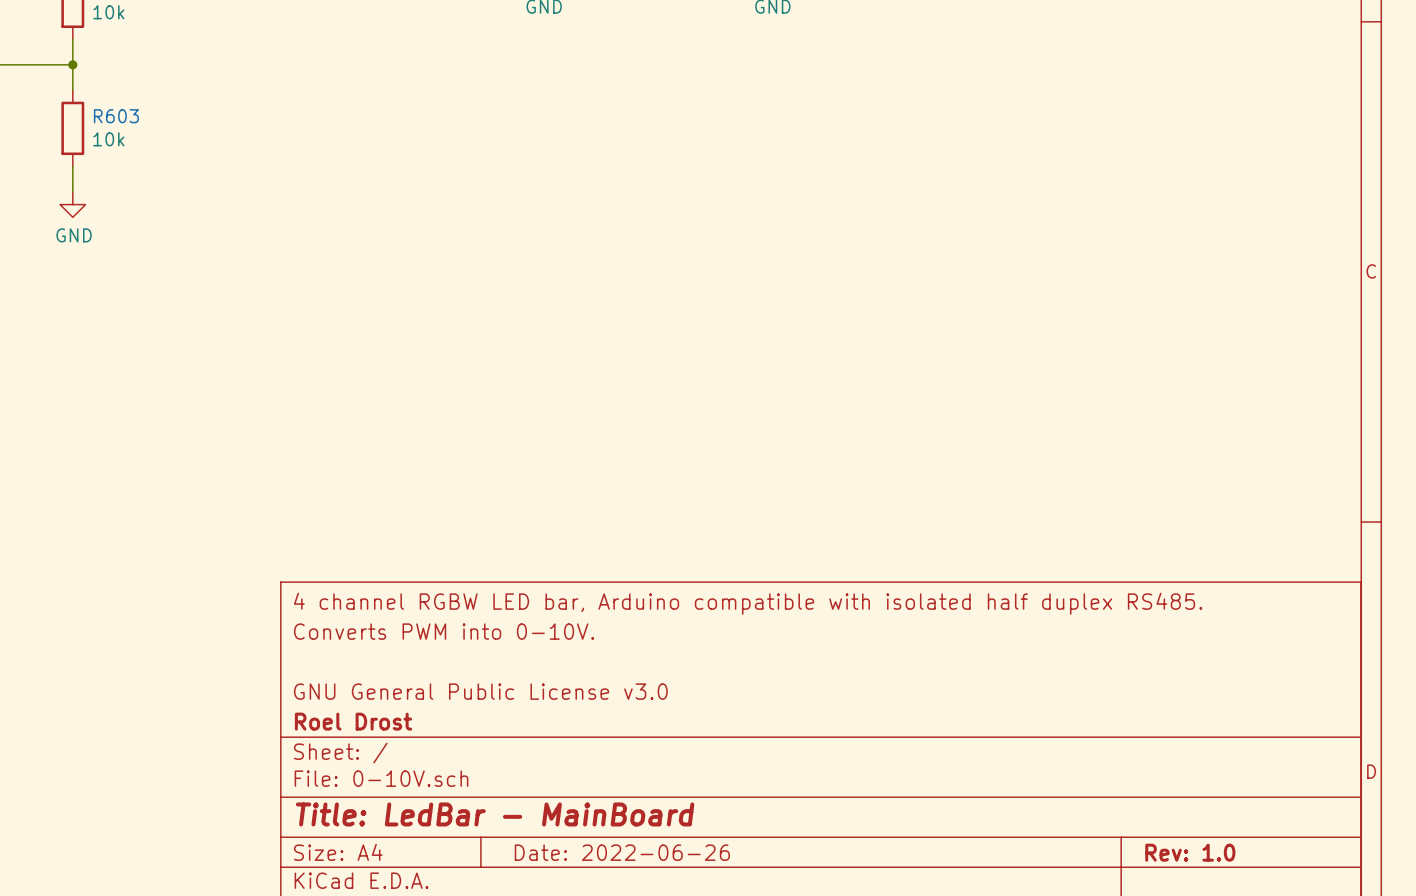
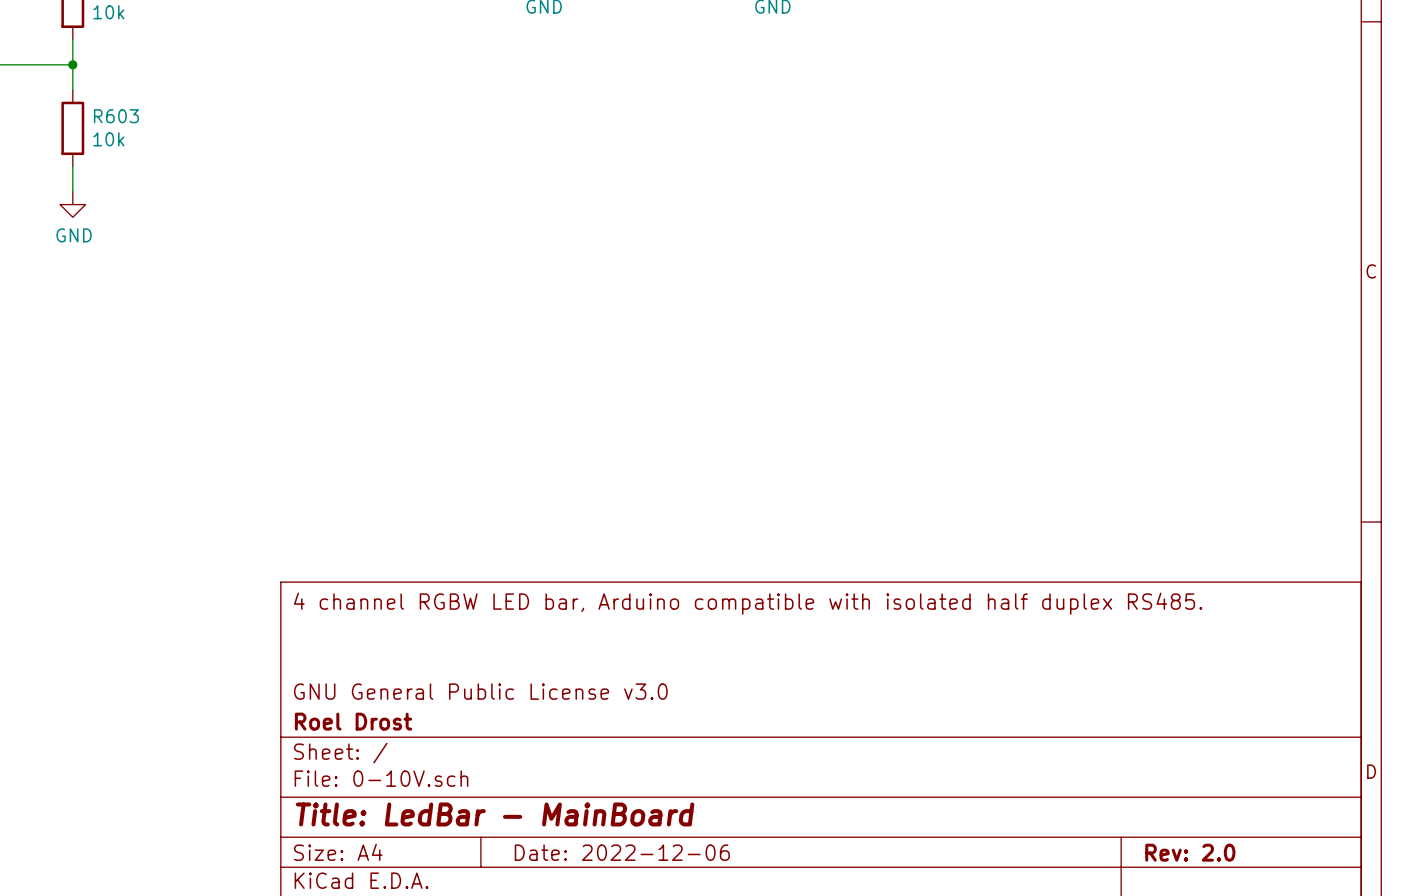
title block: Converts PWM into 0-10V. (444, 631) -> none
title block: Date: 2022-06-26 (622, 852) -> Date: 2022-12-06 (622, 852)
title block: Rev: 1.0 (1190, 852) -> Rev: 2.0 (1190, 852)

